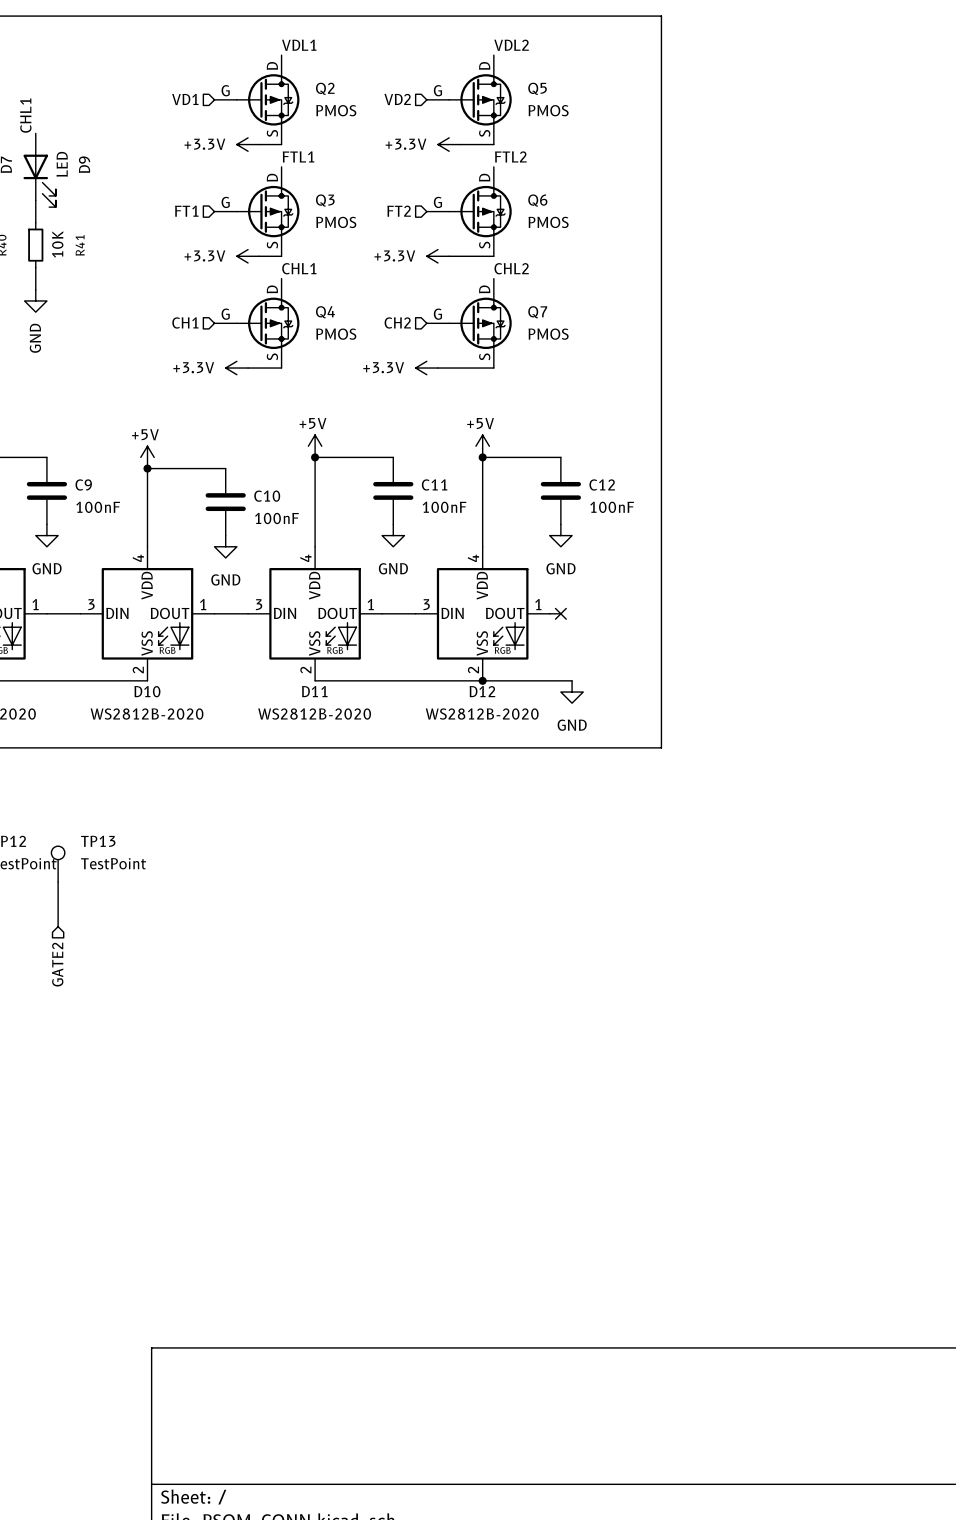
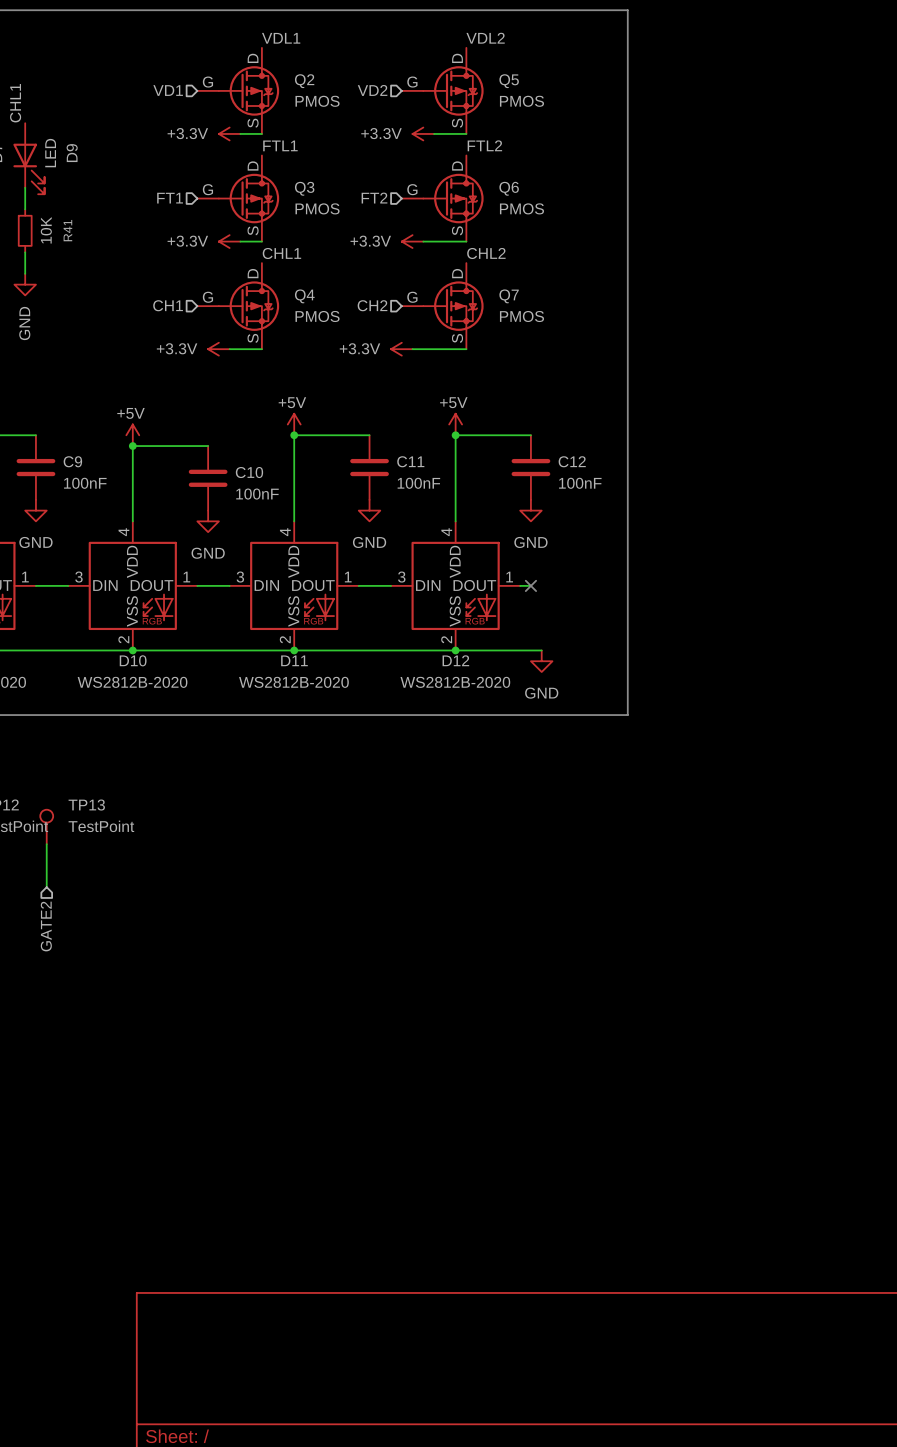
wire: none -> (132, 650) (294, 650)
junction: none -> (132, 650)
junction: none -> (294, 650)

